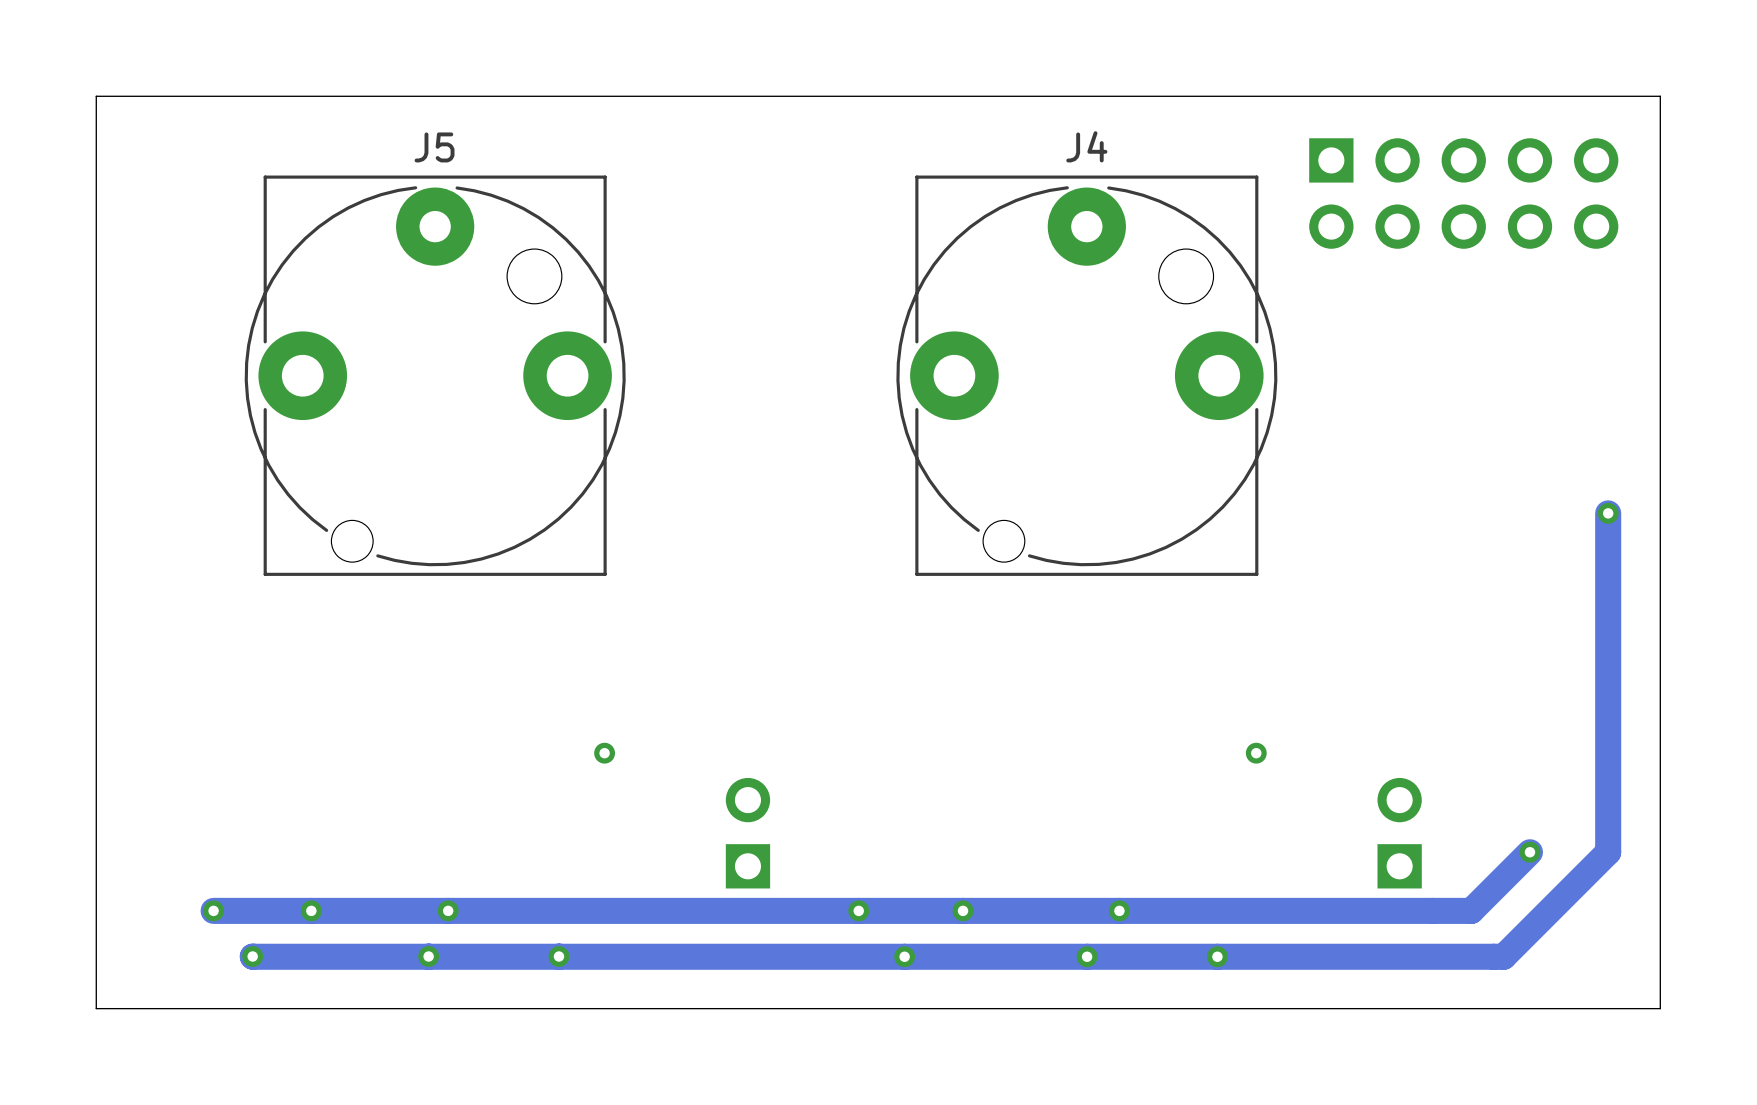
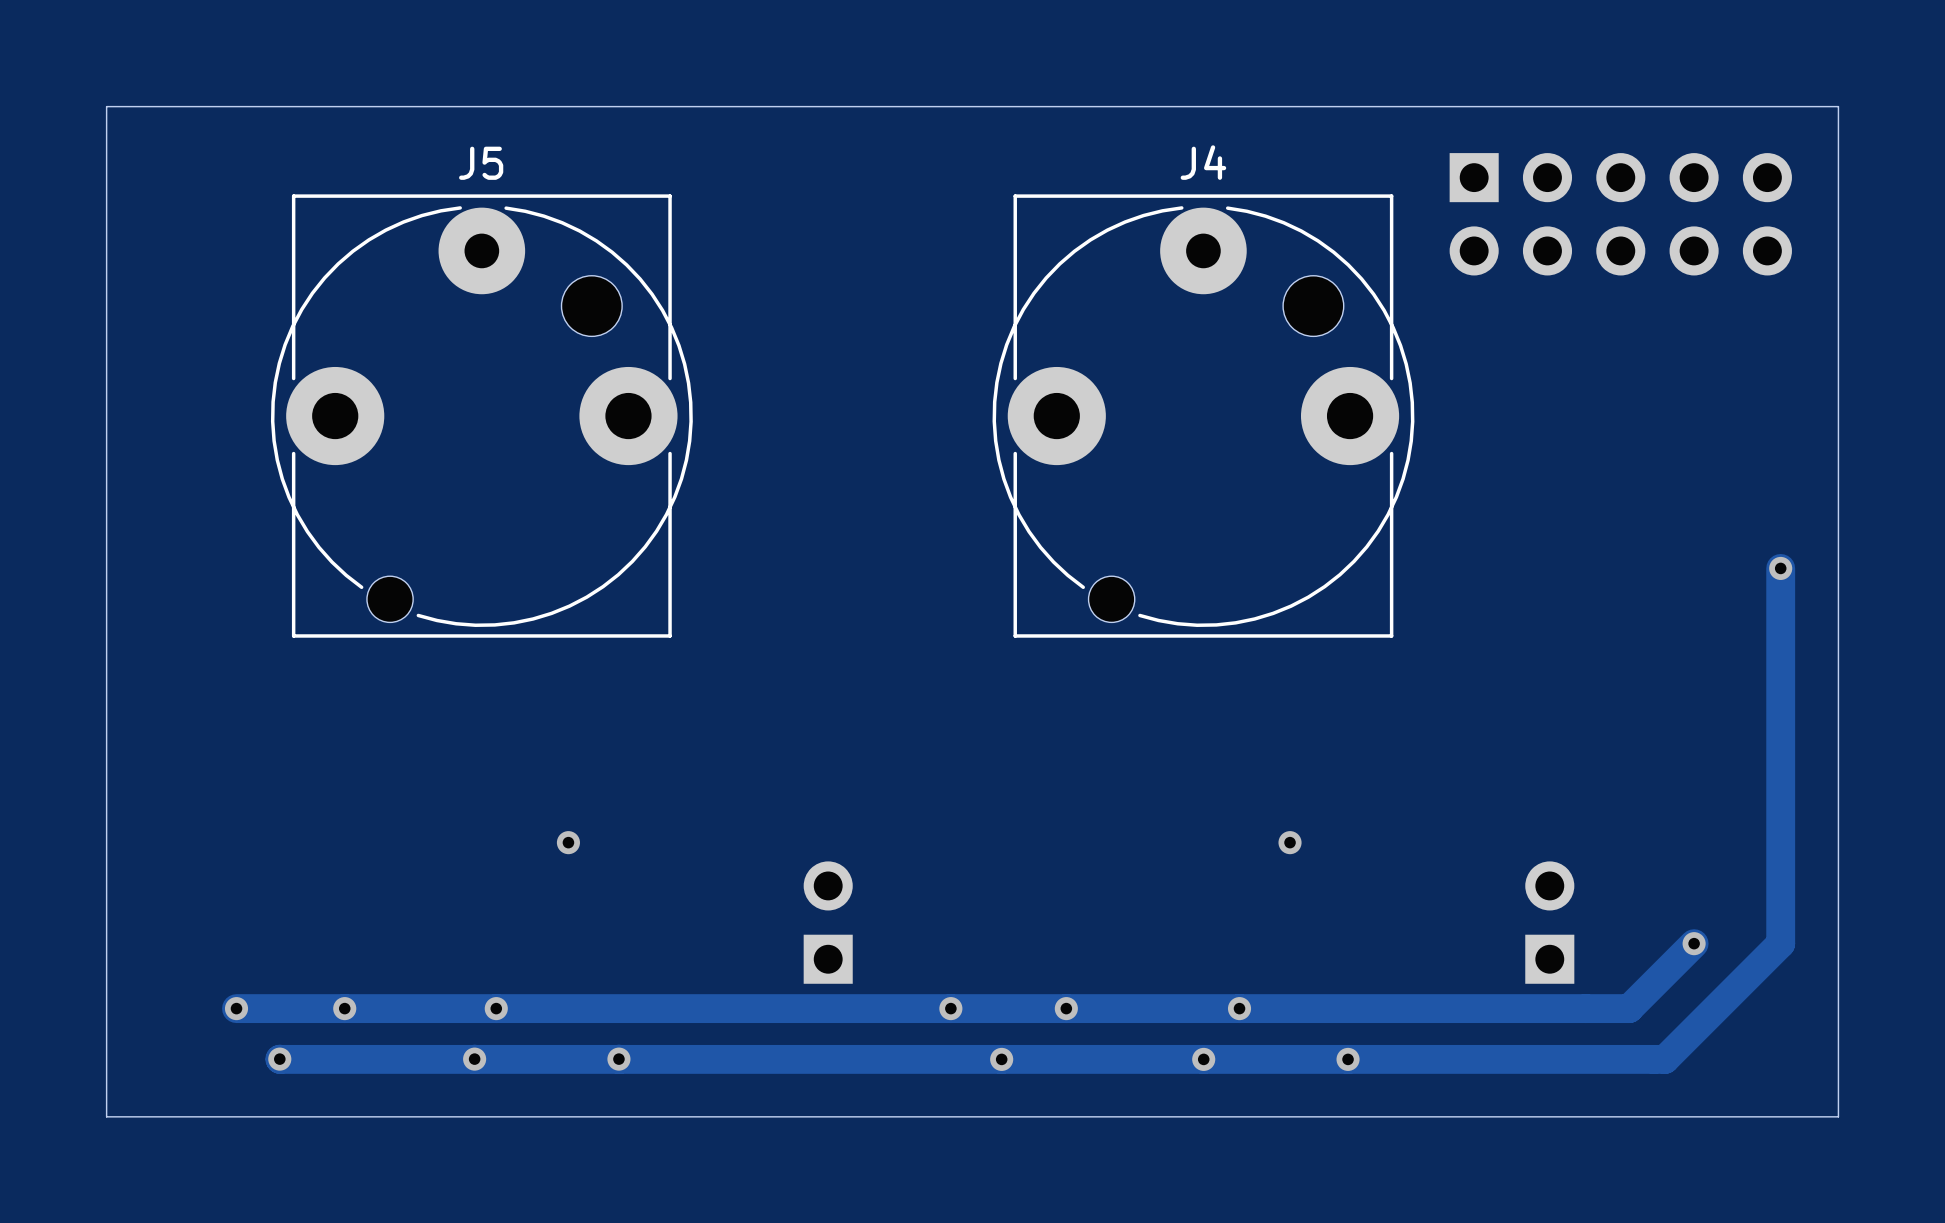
via position: (604, 753) -> (568, 842)
via position: (1256, 753) -> (1290, 842)

